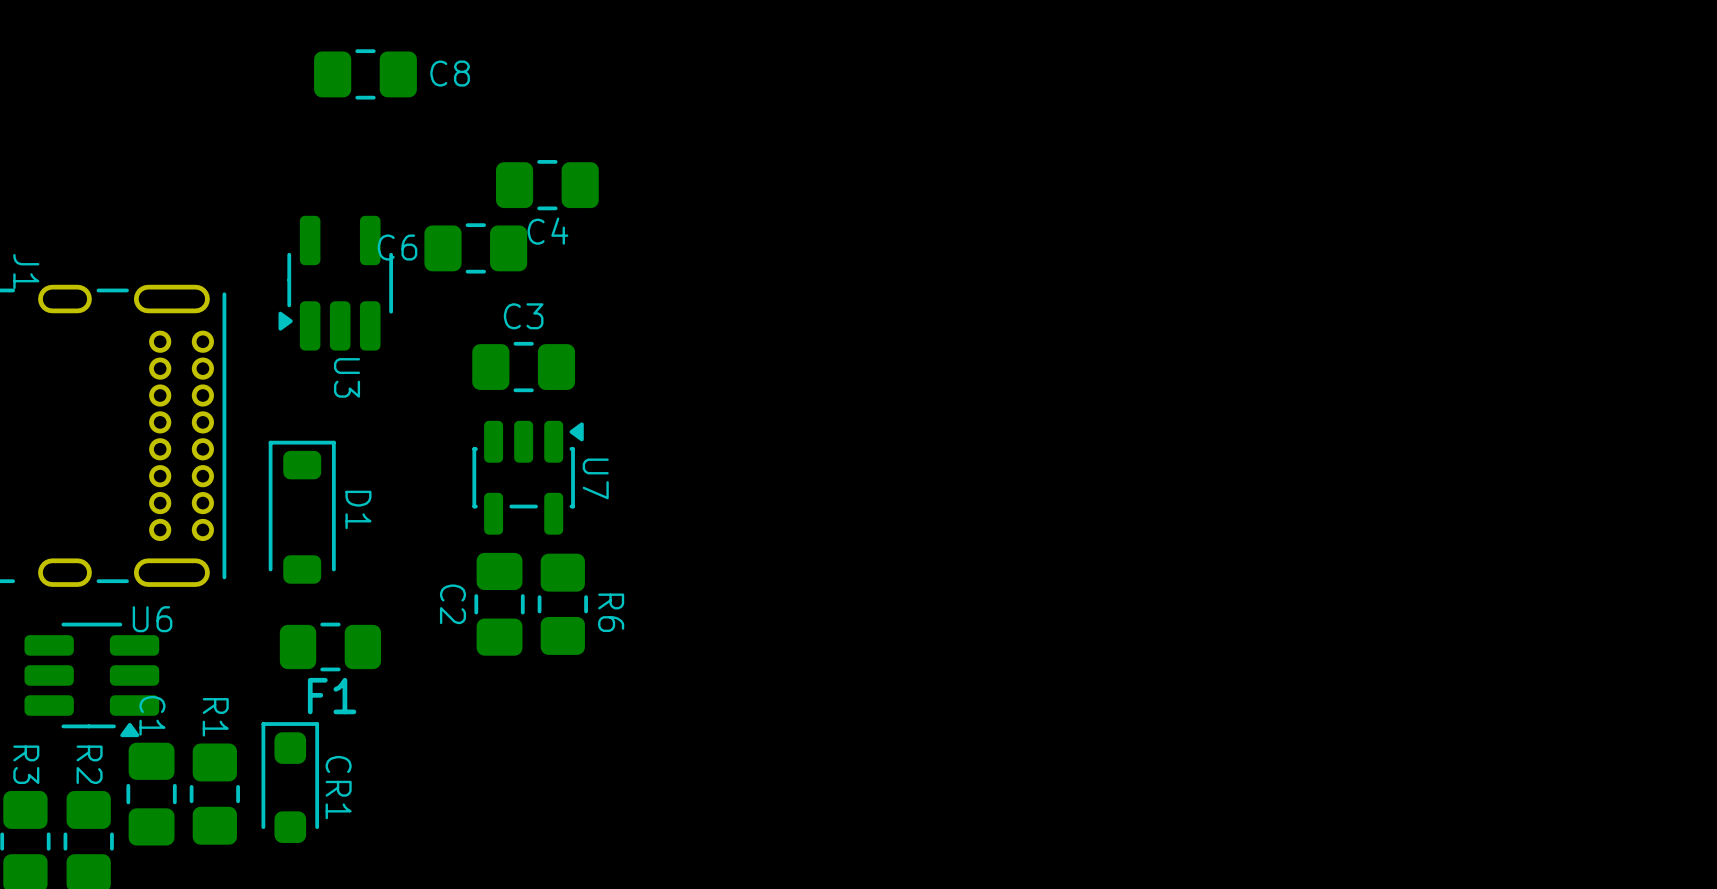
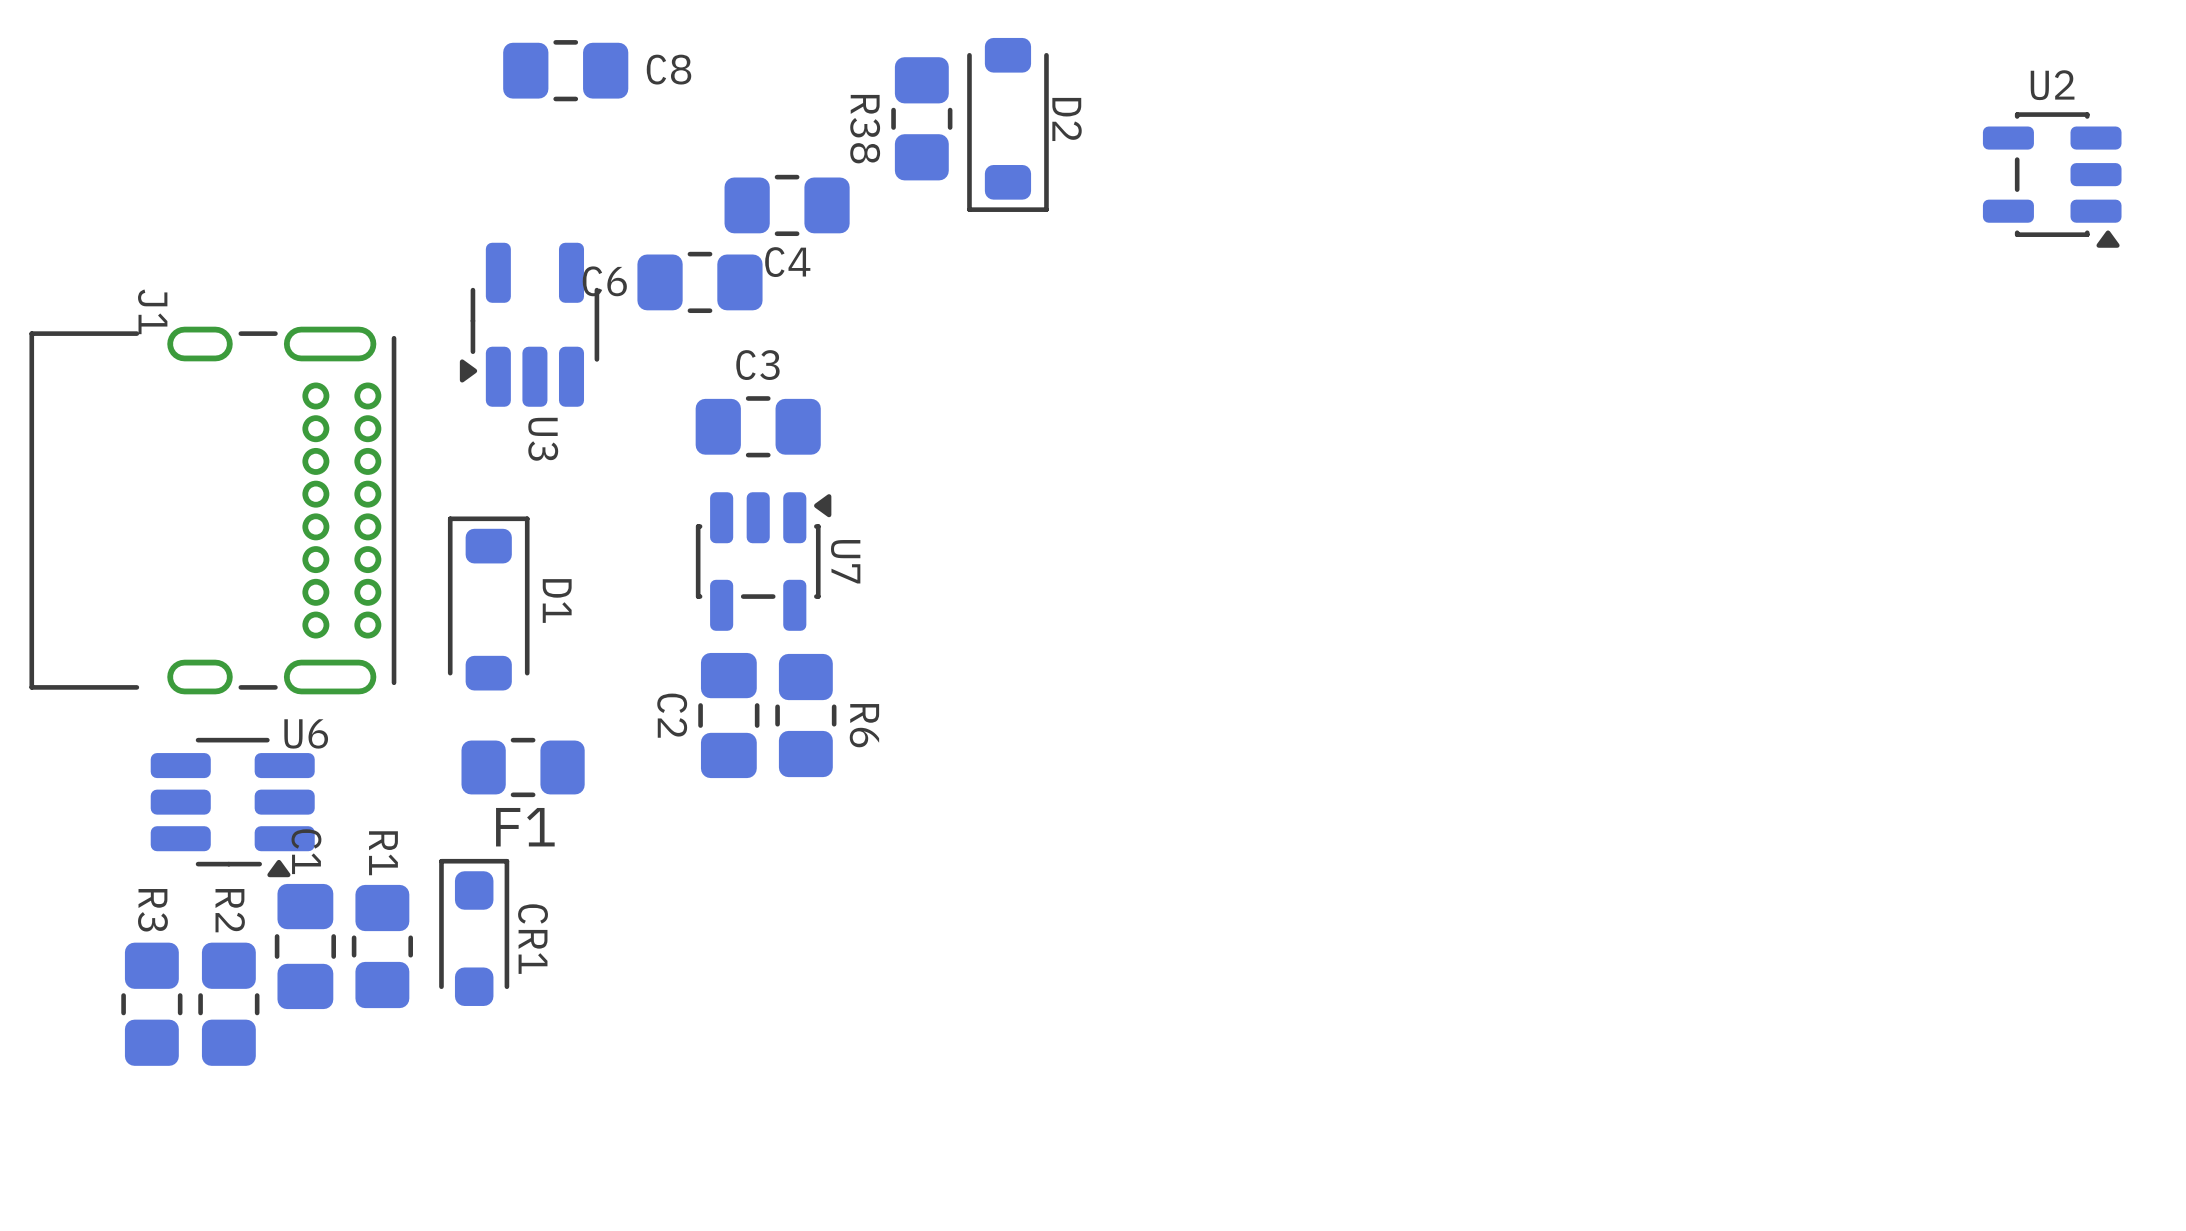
R38: none -> (921, 118)
D2: none -> (1007, 124)
U2: none -> (2052, 180)

